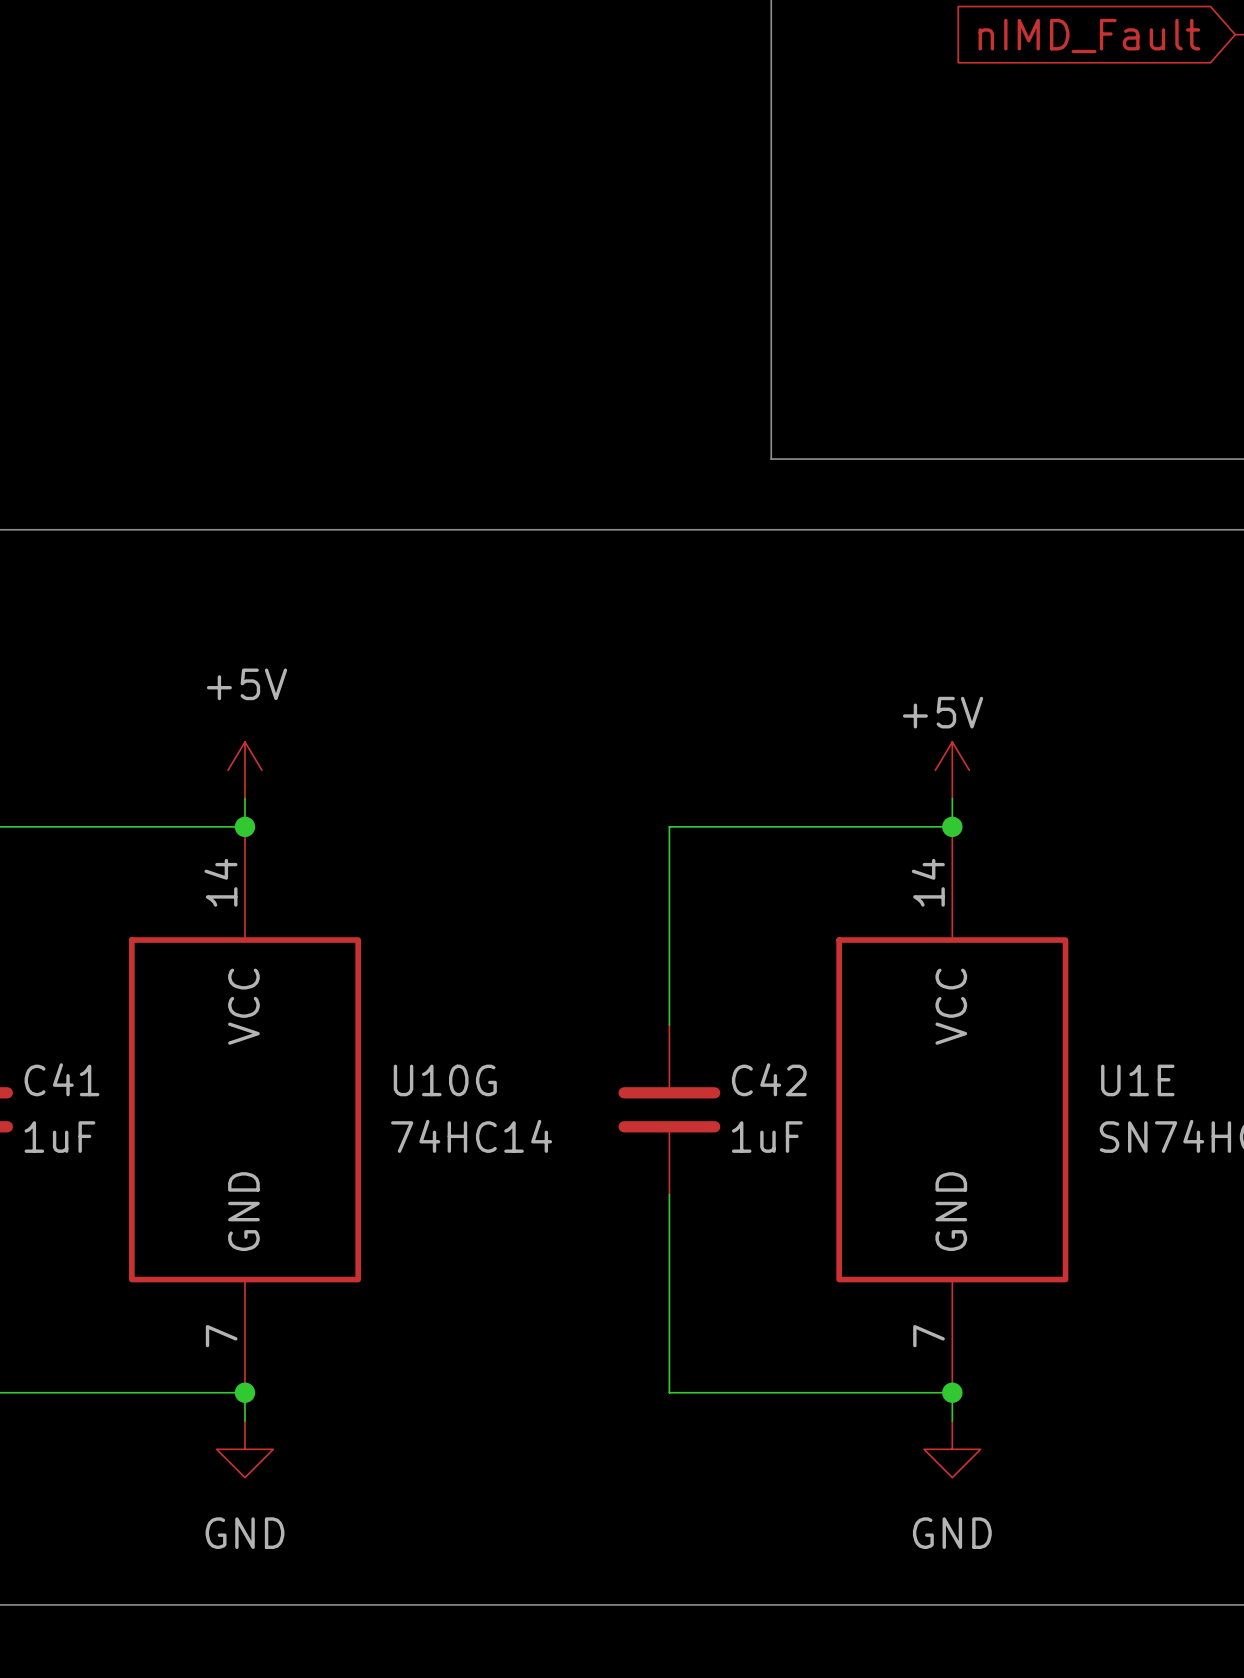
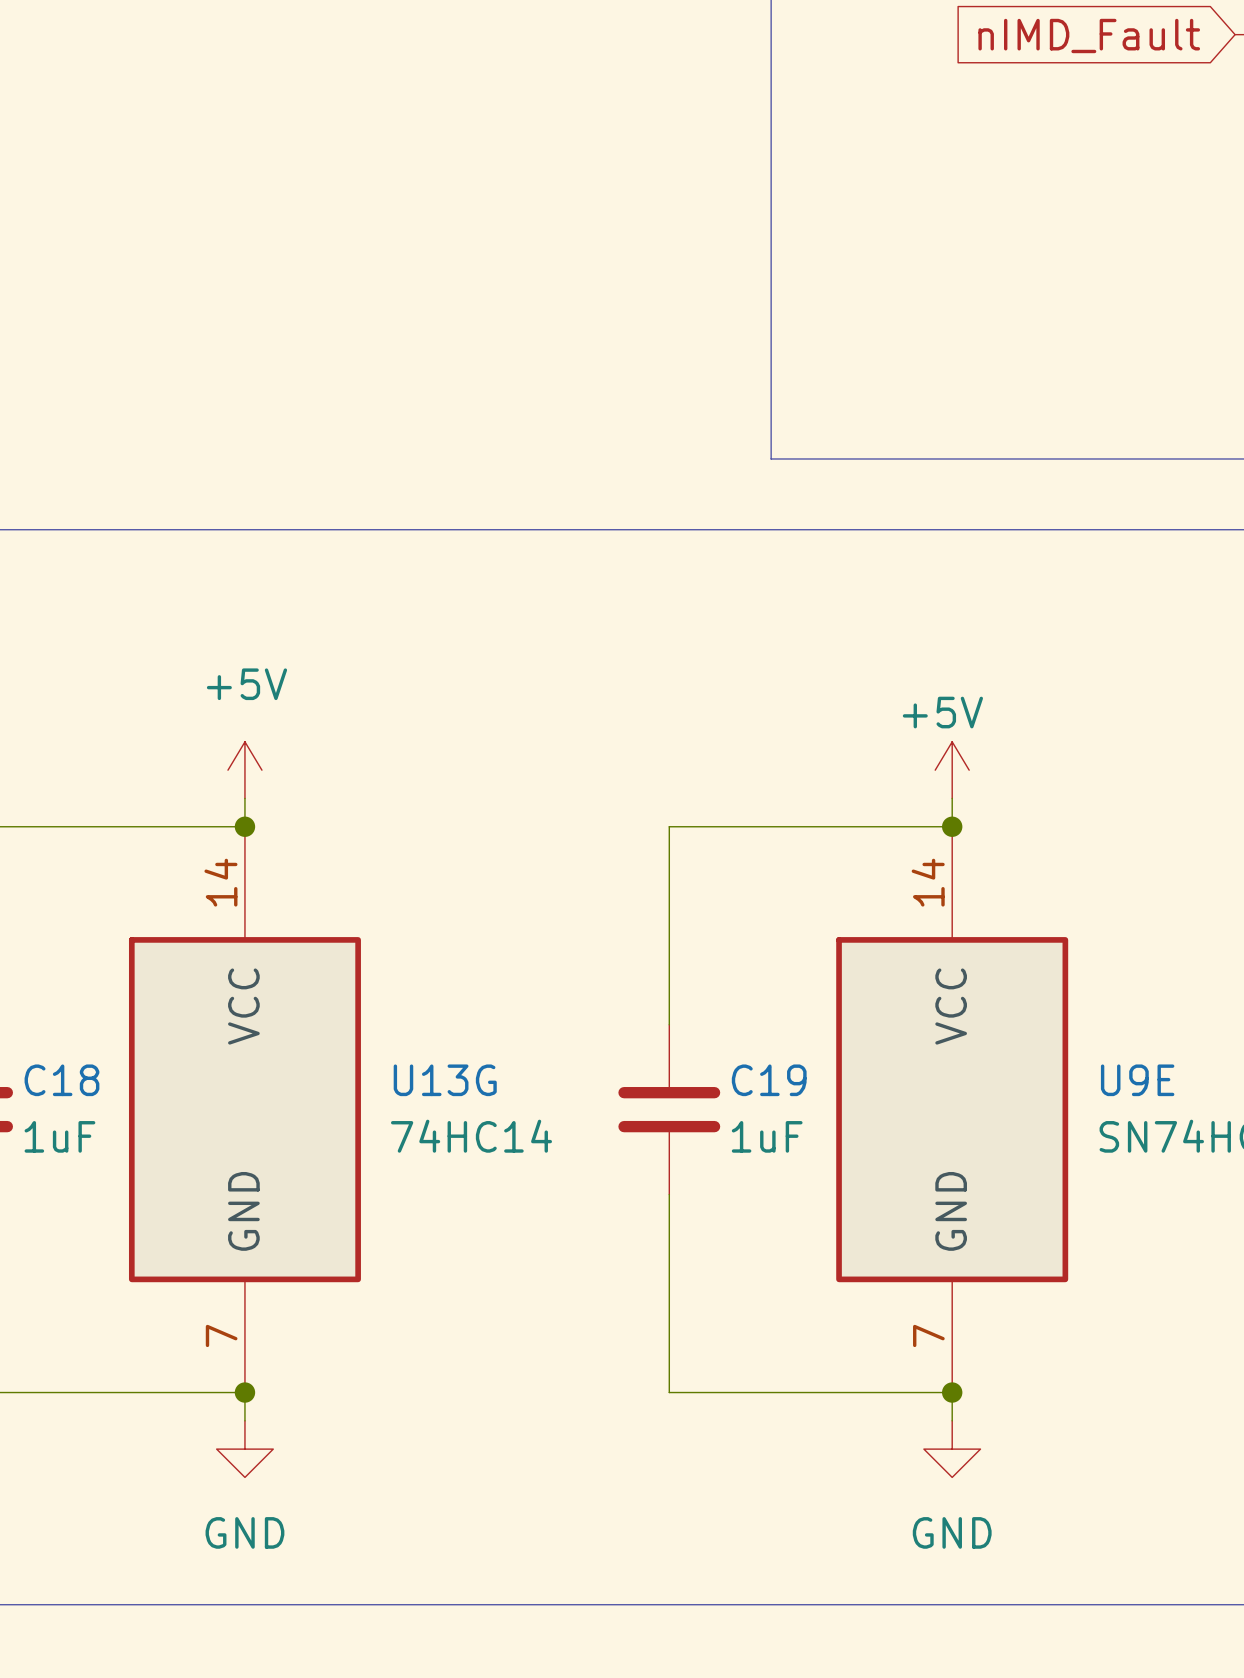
C41 name: C41 (61, 1079) -> C18 (61, 1080)
C42 name: C42 (769, 1079) -> C19 (769, 1080)
U10G name: U10G (445, 1080) -> U13G (445, 1080)
U1E name: U1E (1137, 1080) -> U9E (1137, 1080)

